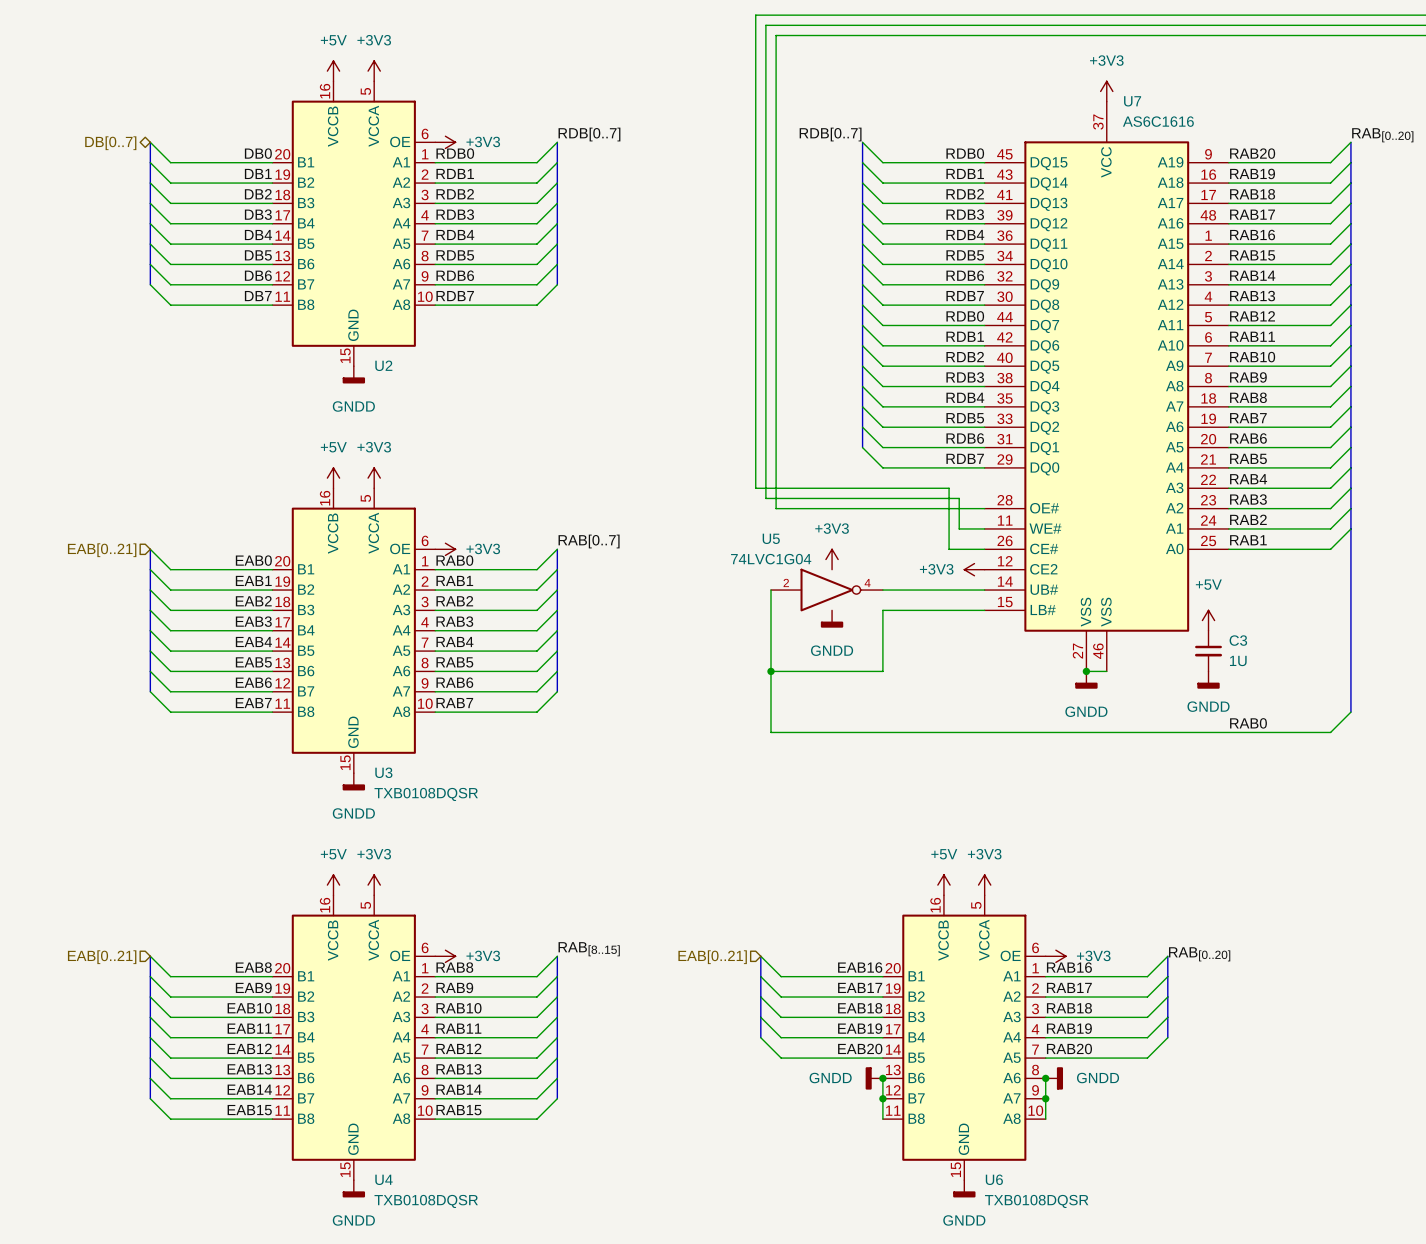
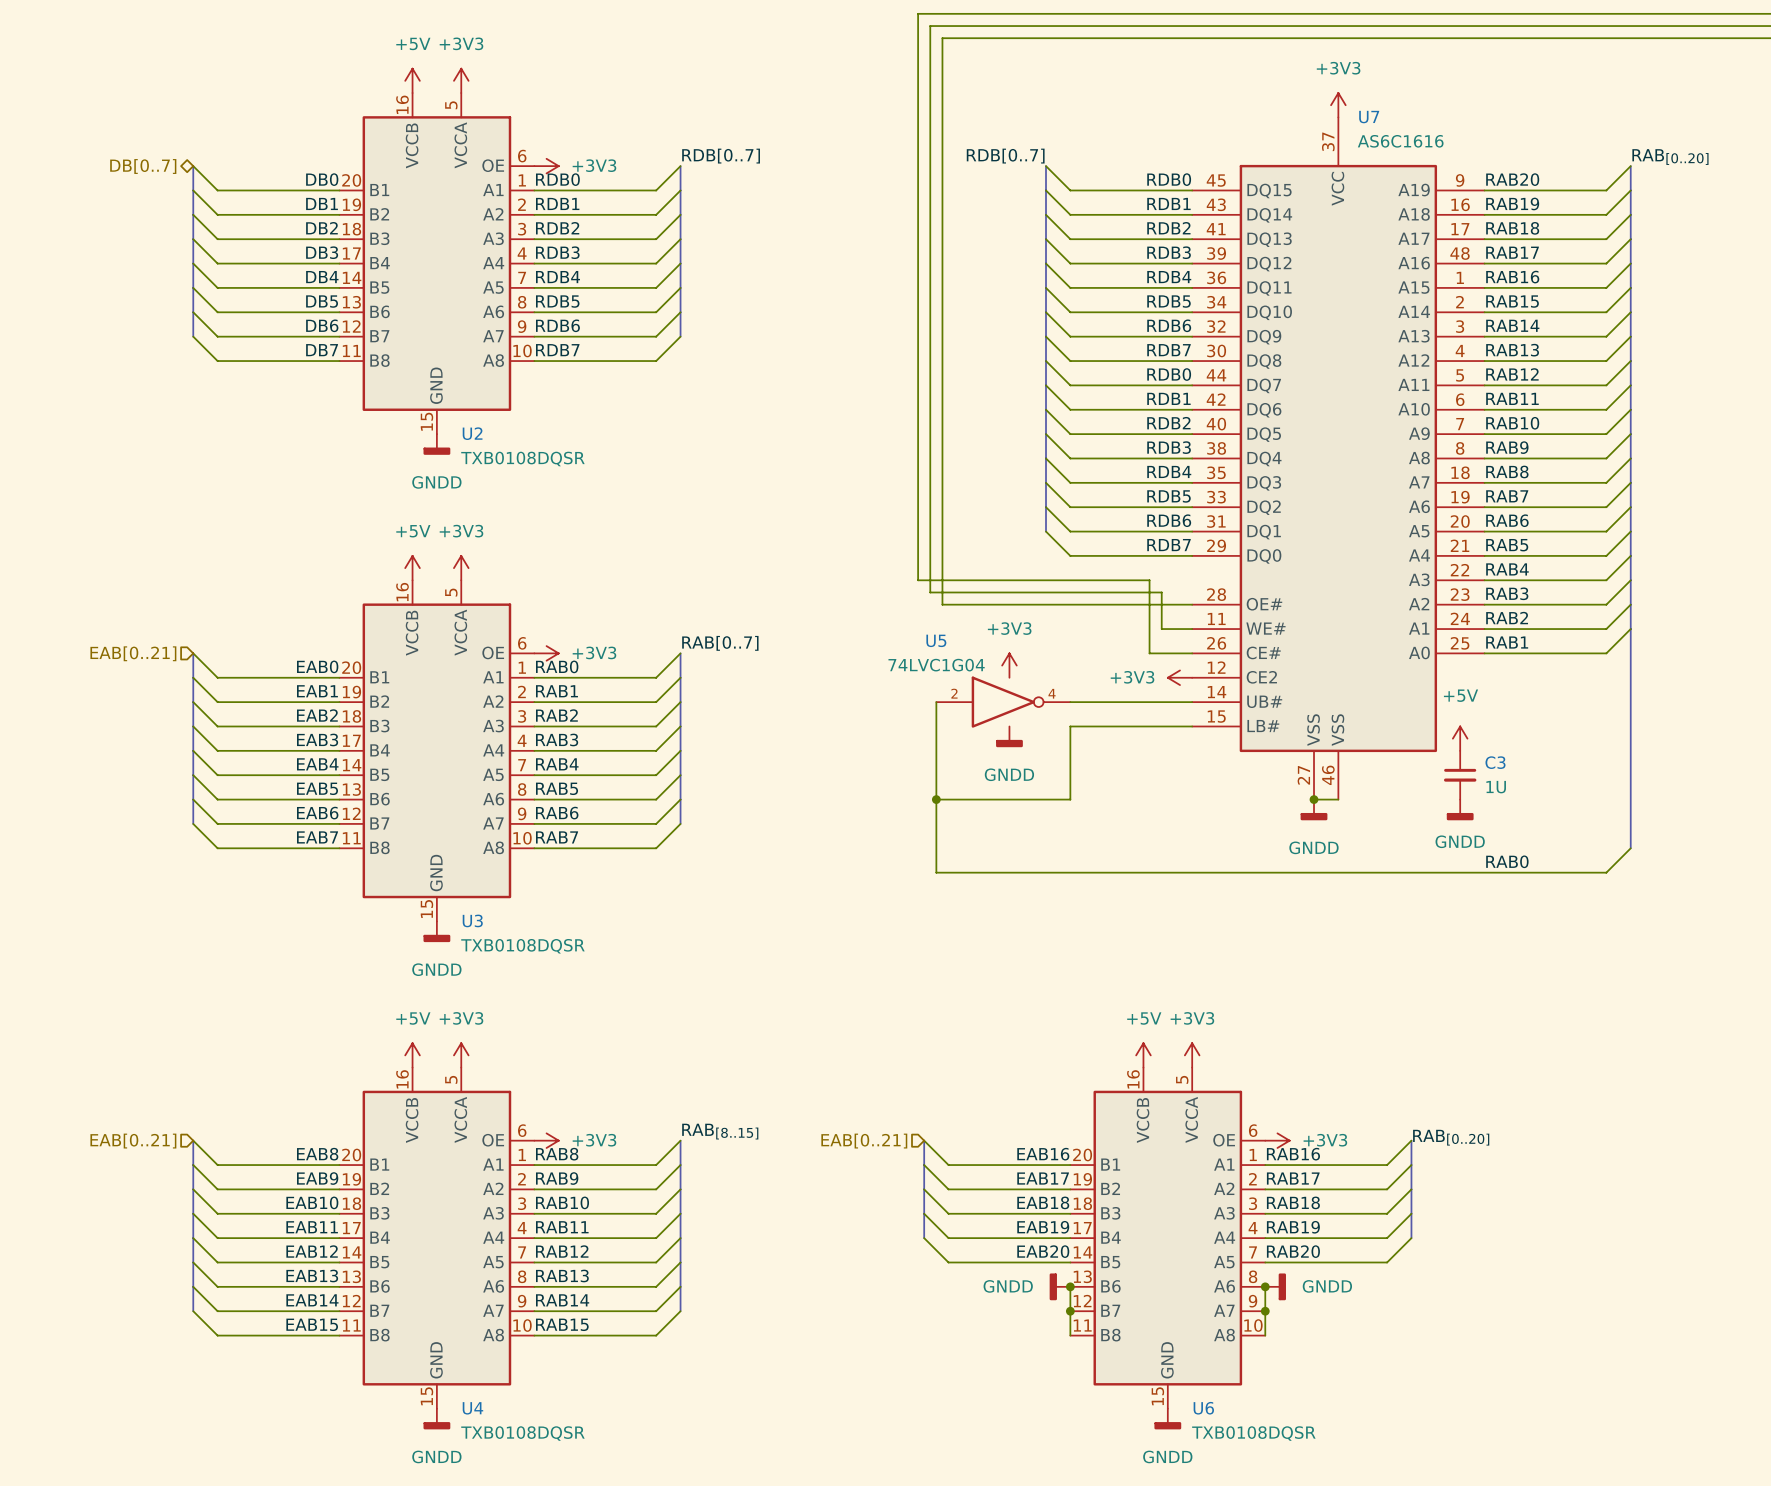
U2 value: none -> TXB0108DQSR (522, 458)

